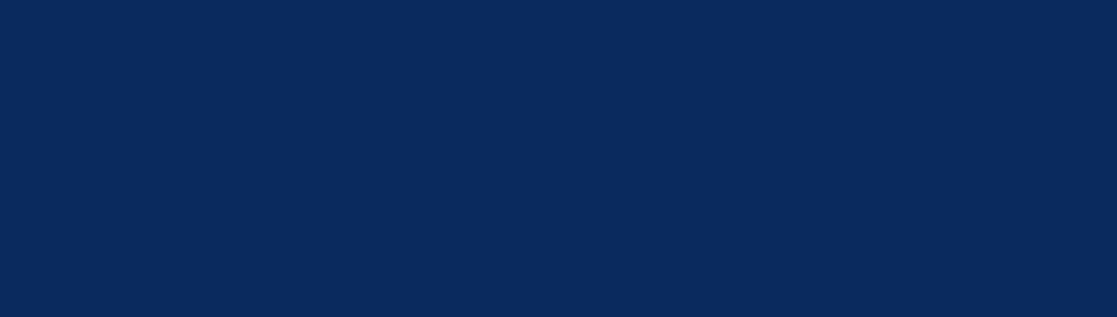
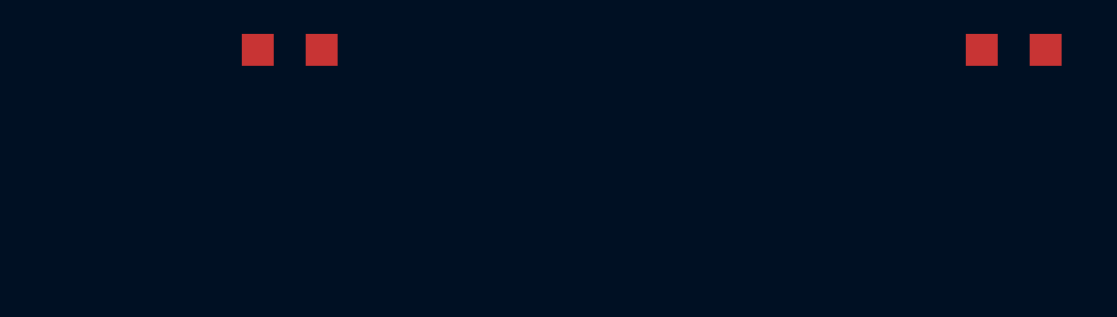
part: none -> (289, 49)
part: none -> (1013, 49)

